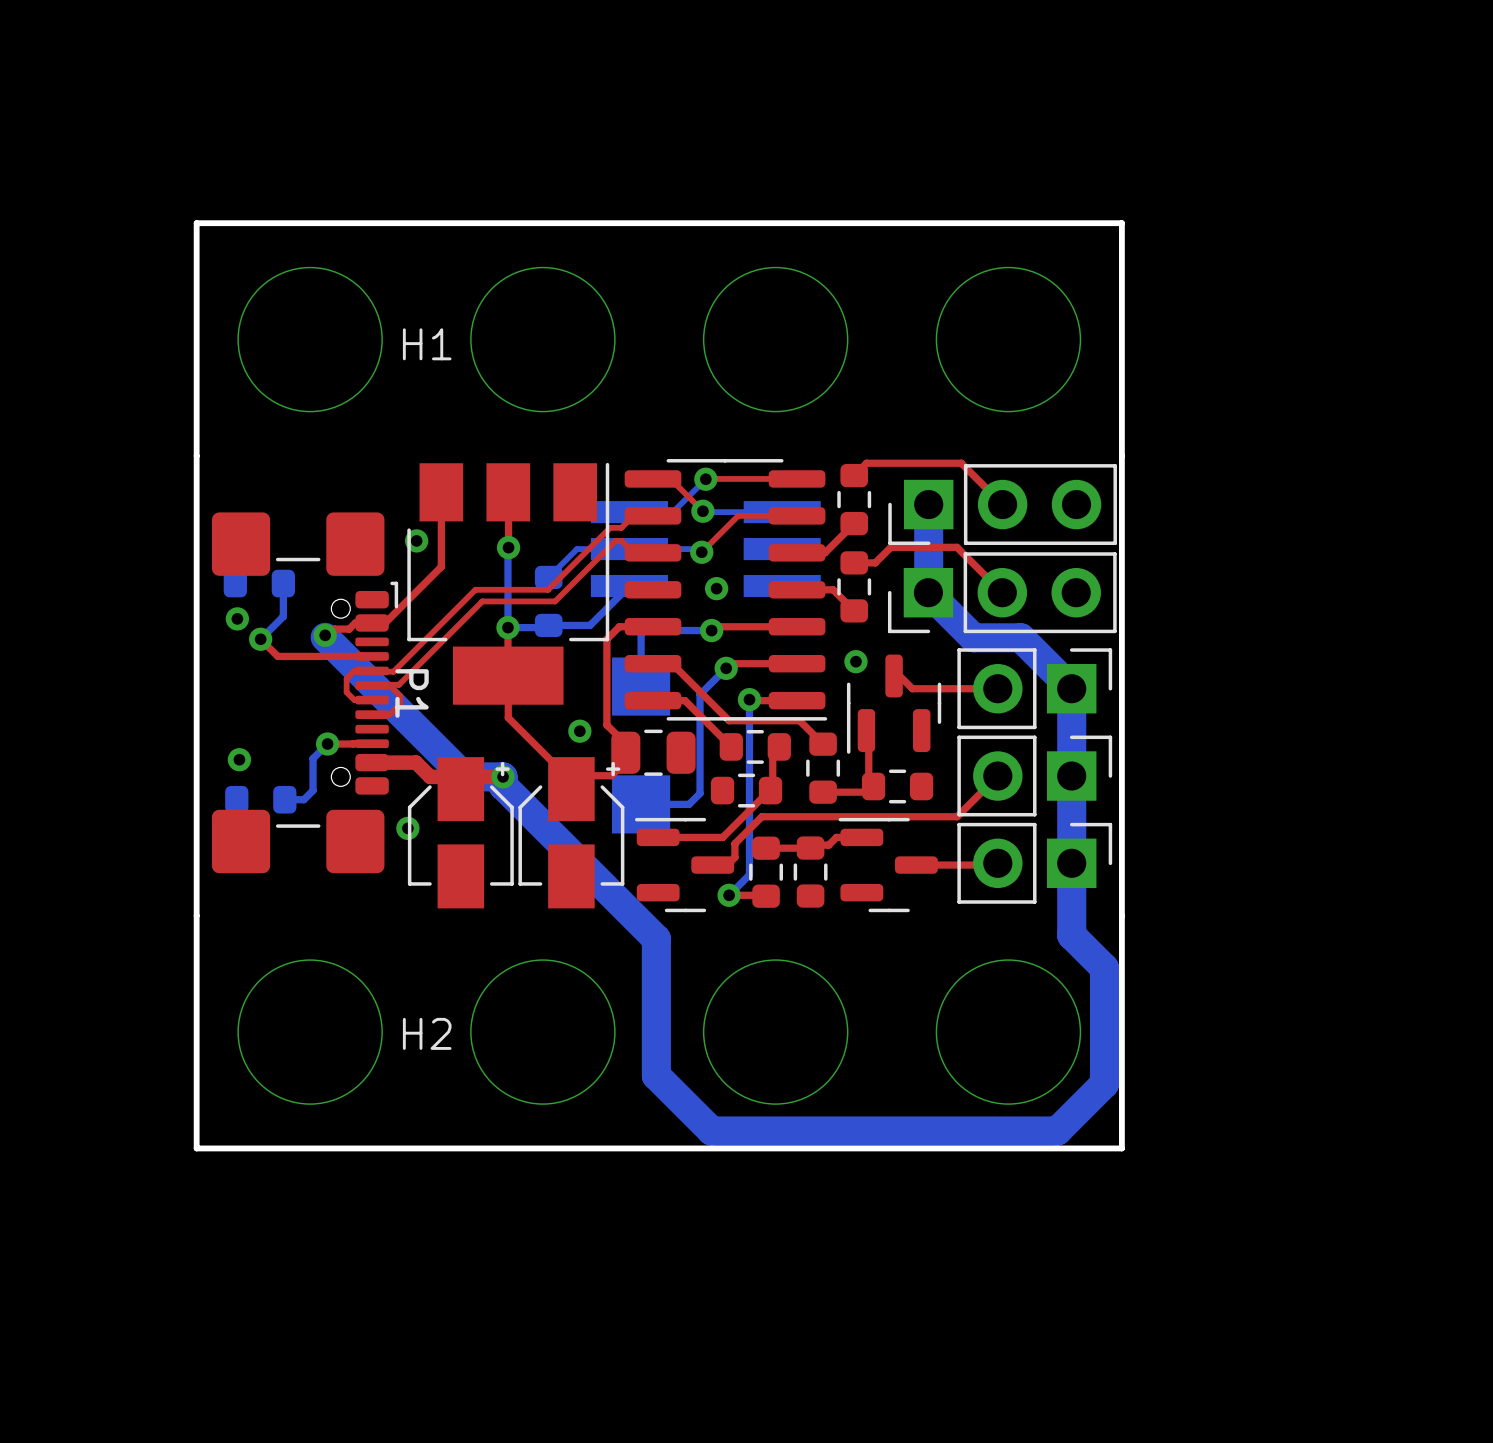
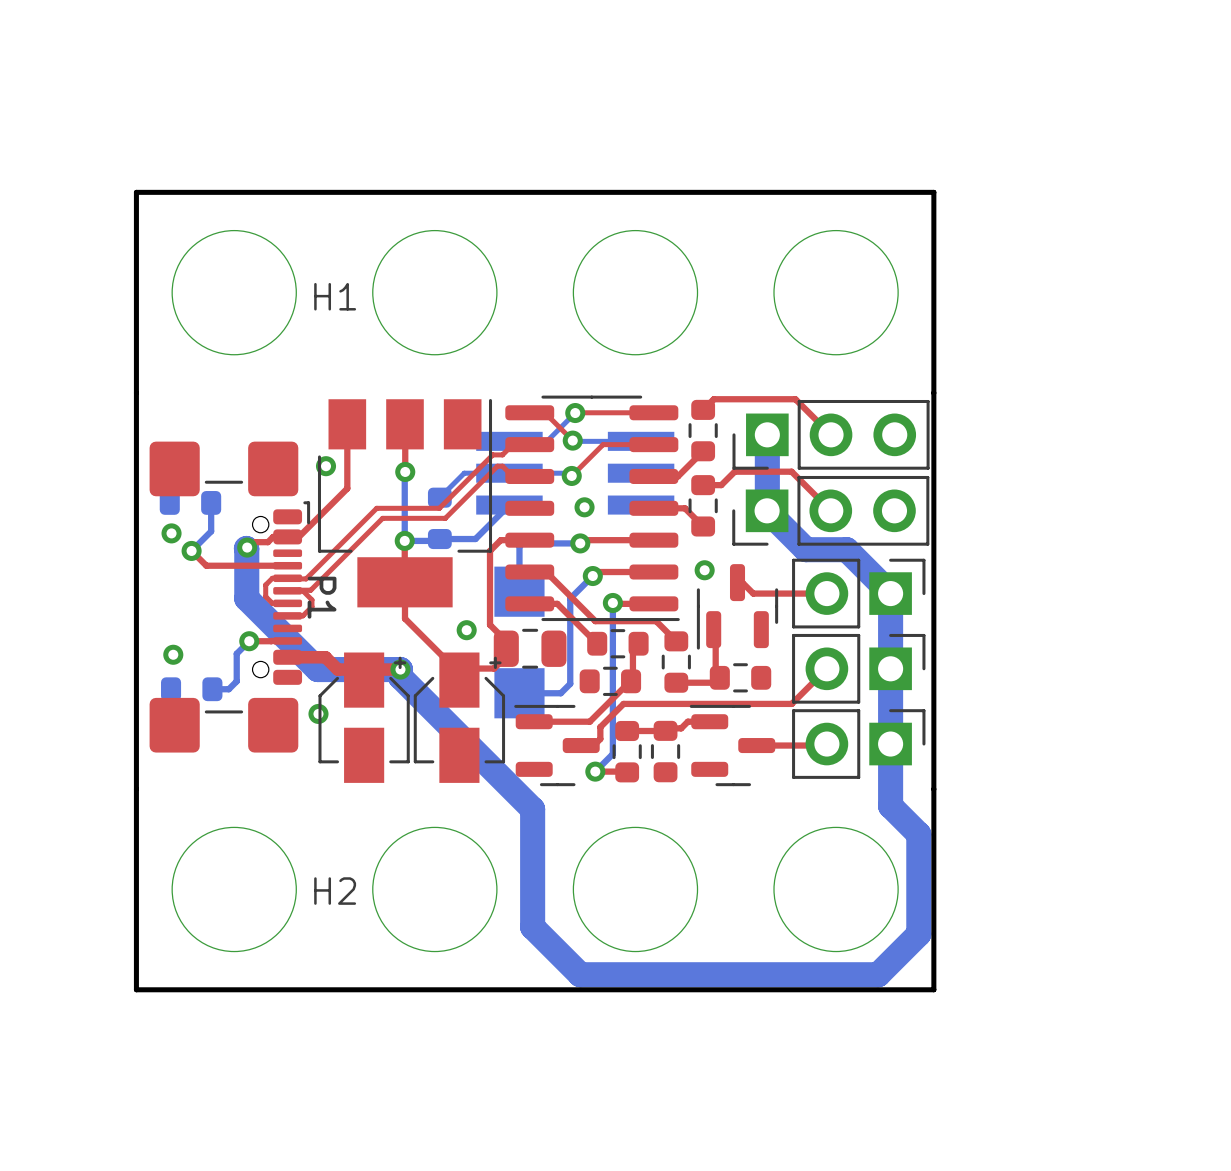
bottom track: (325, 637) (464, 776) -> (246, 548) (246, 598) (317, 669) (367, 669)

